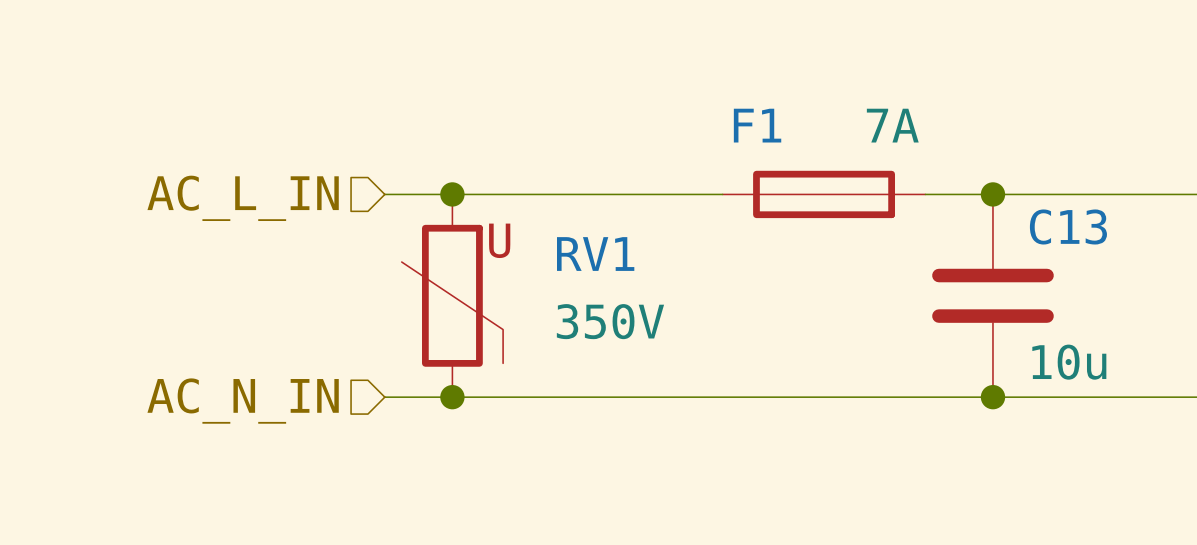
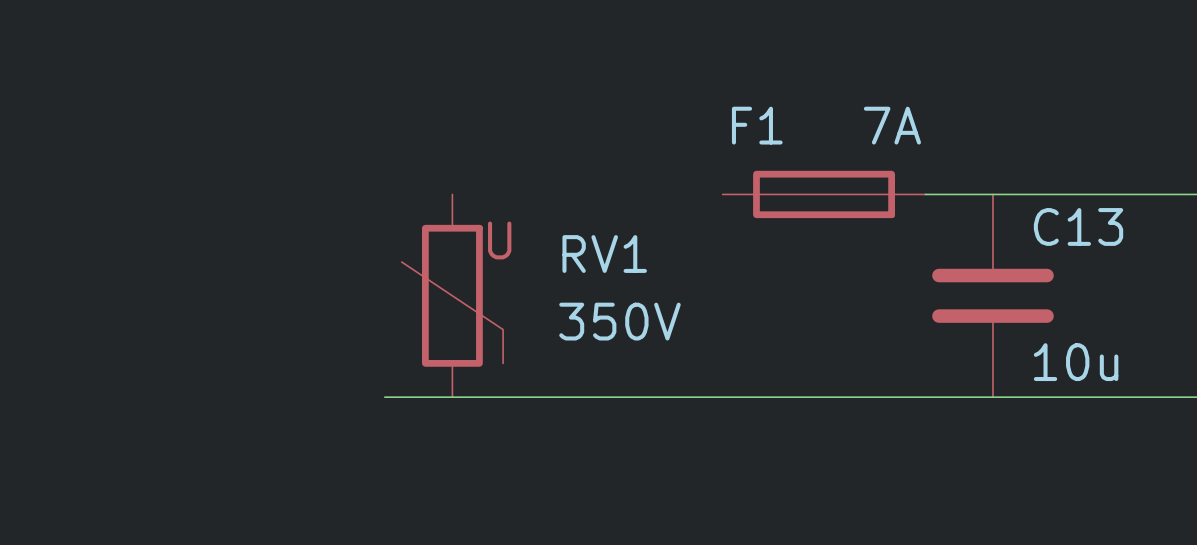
wire: (384, 194) (722, 194) -> none
junction: (452, 194) -> none
junction: (992, 194) -> none
hierarchical label: AC_L_IN (243, 198) -> none
junction: (452, 397) -> none
junction: (992, 397) -> none
hierarchical label: AC_N_IN (243, 401) -> none

